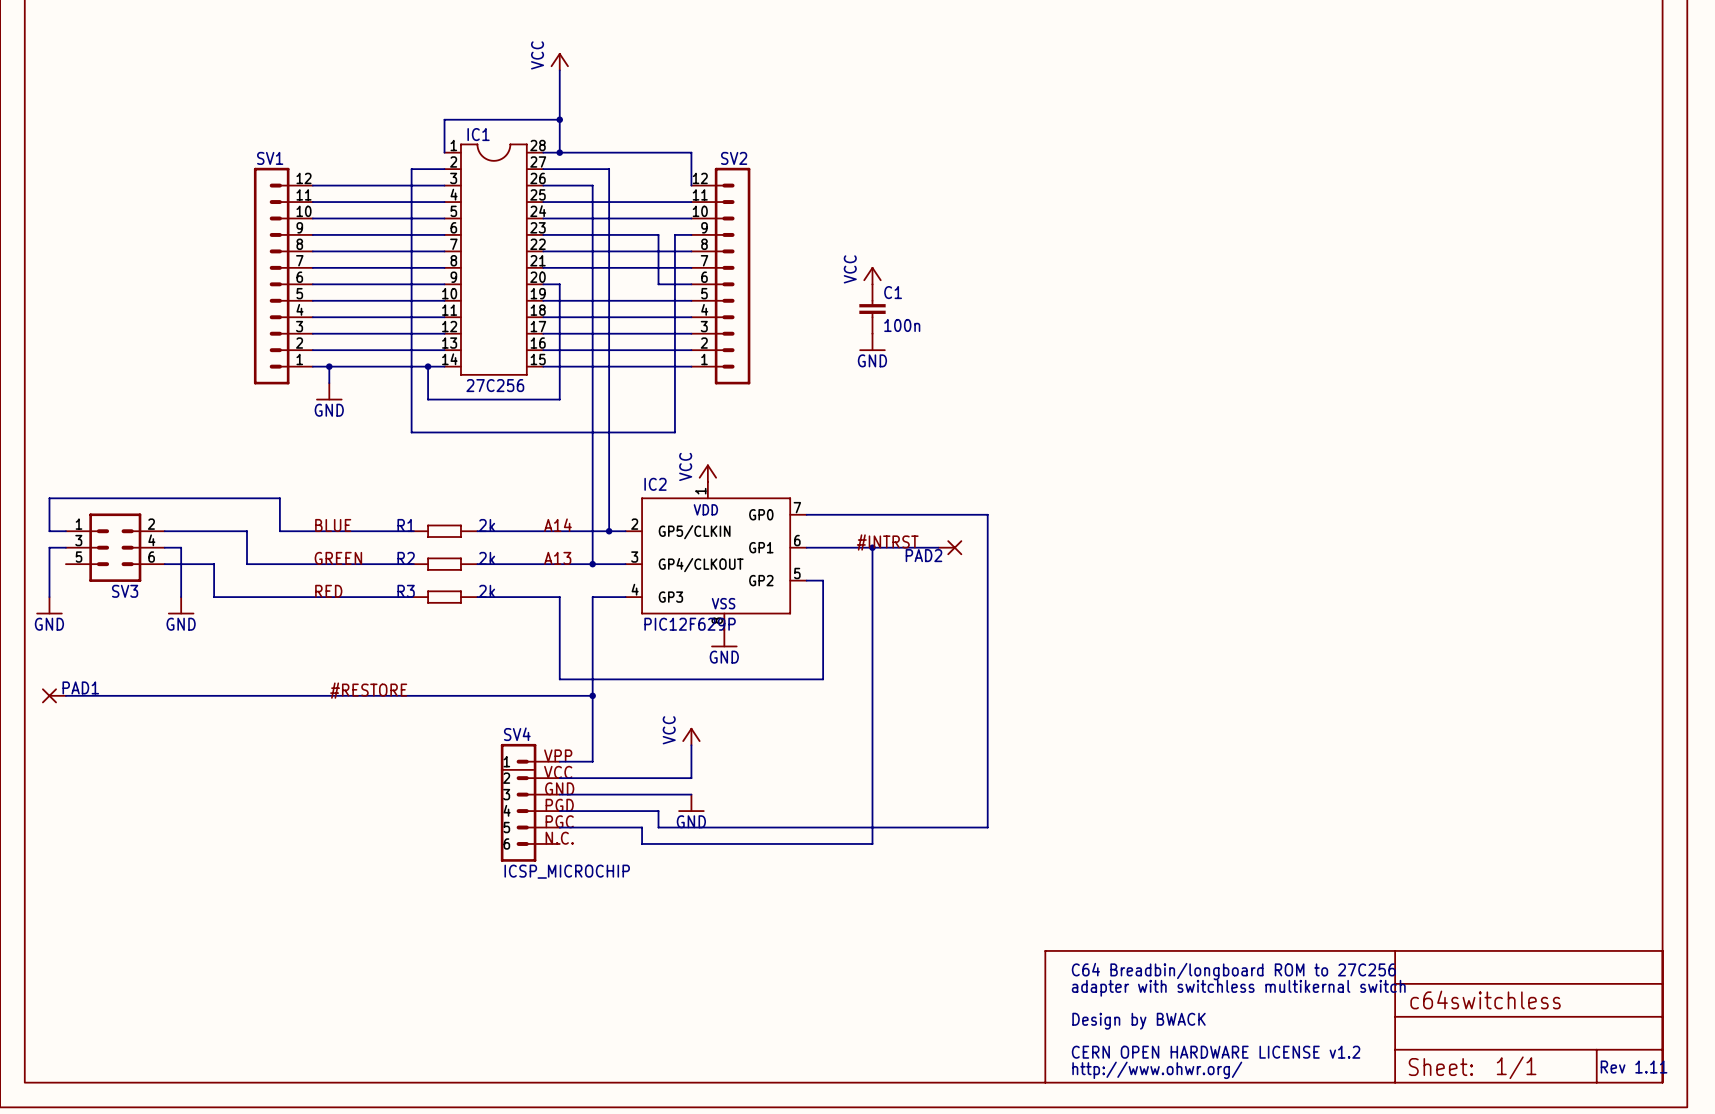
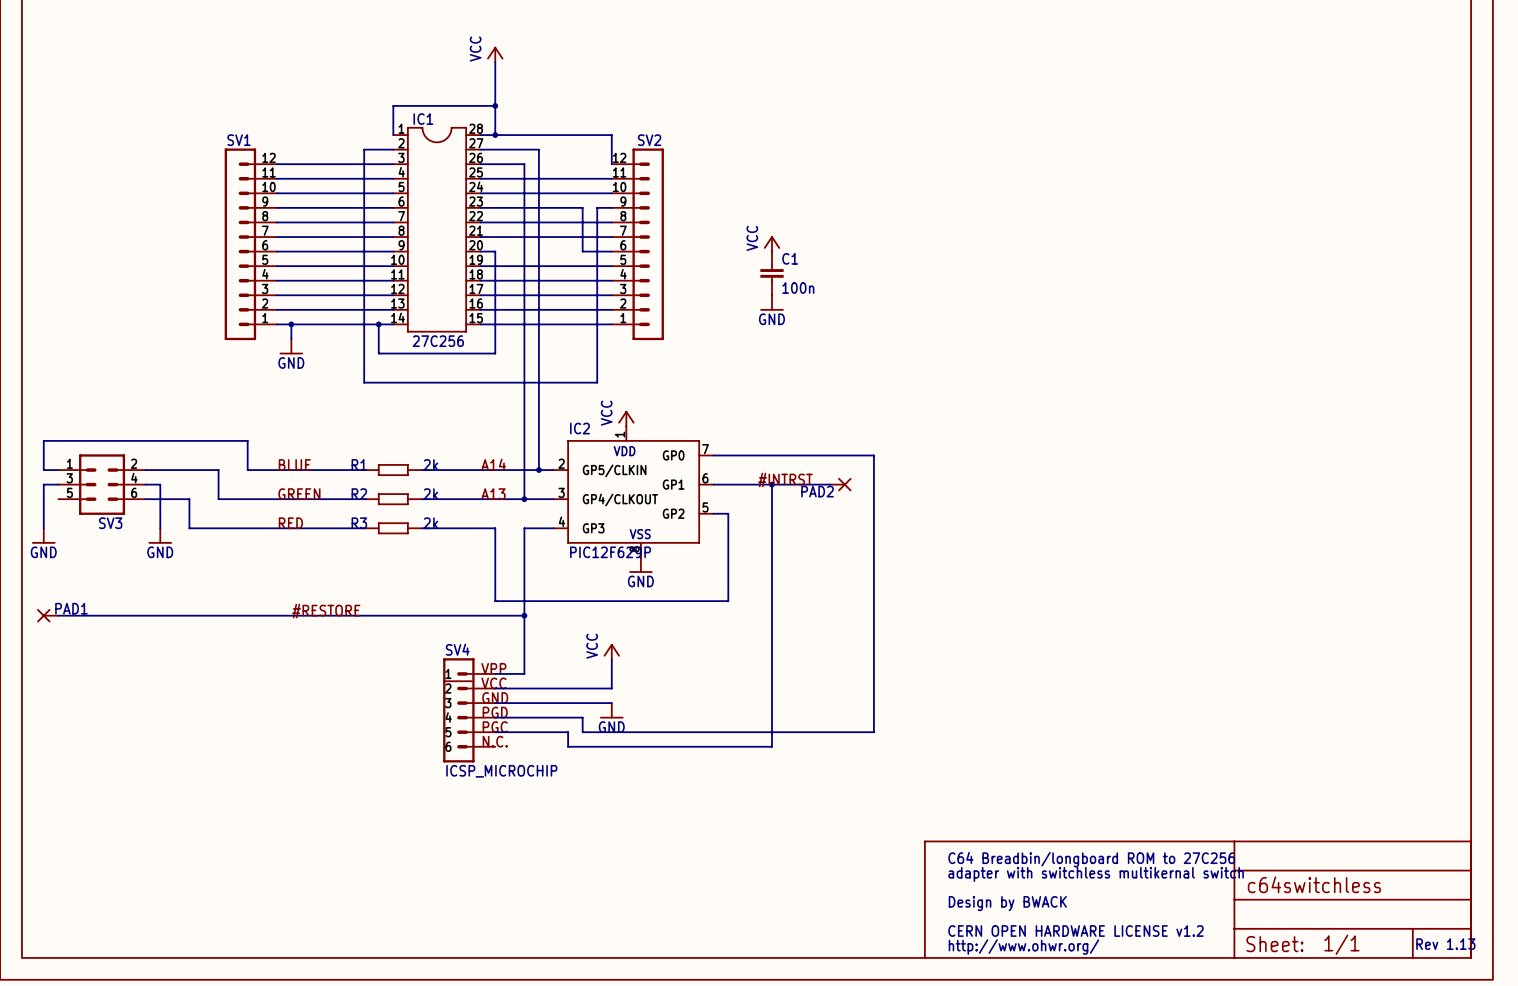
text: Rev 1.11 (1634, 1067) -> Rev 1.13 (1445, 944)

